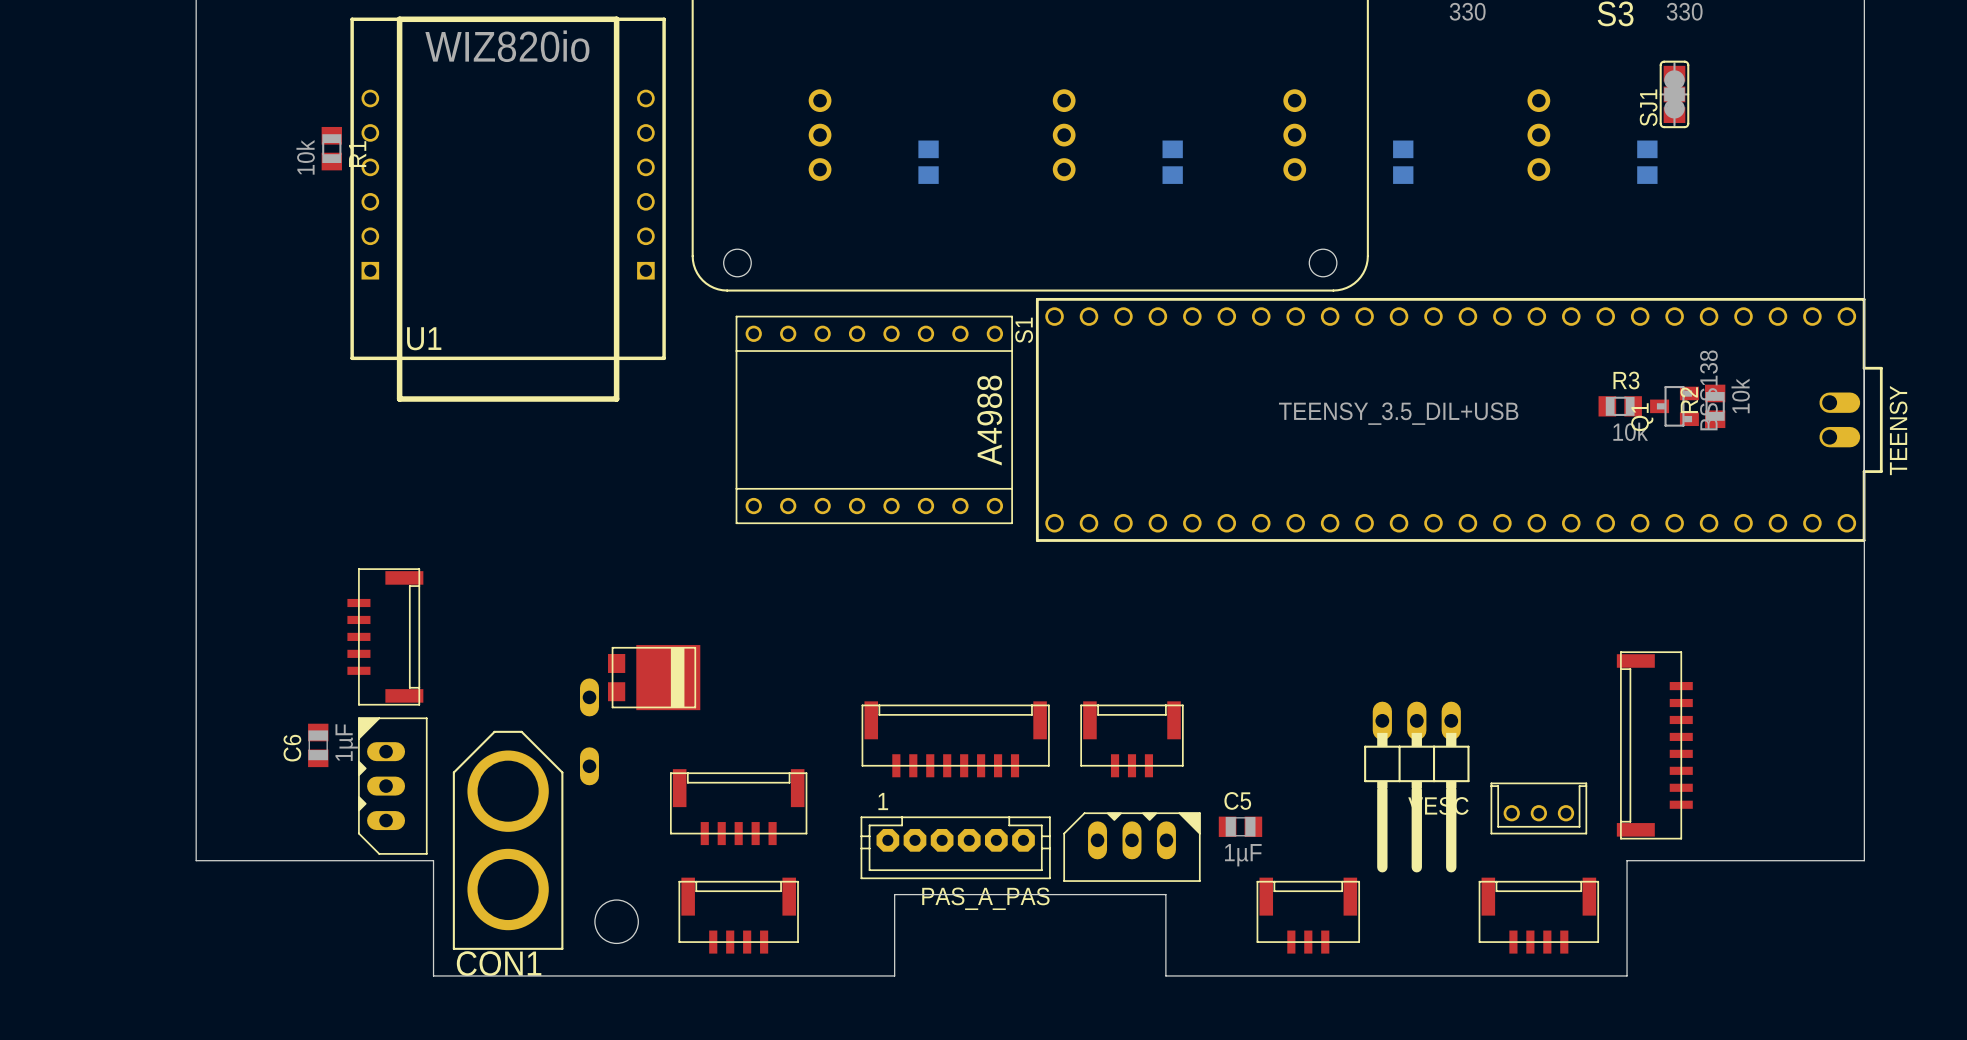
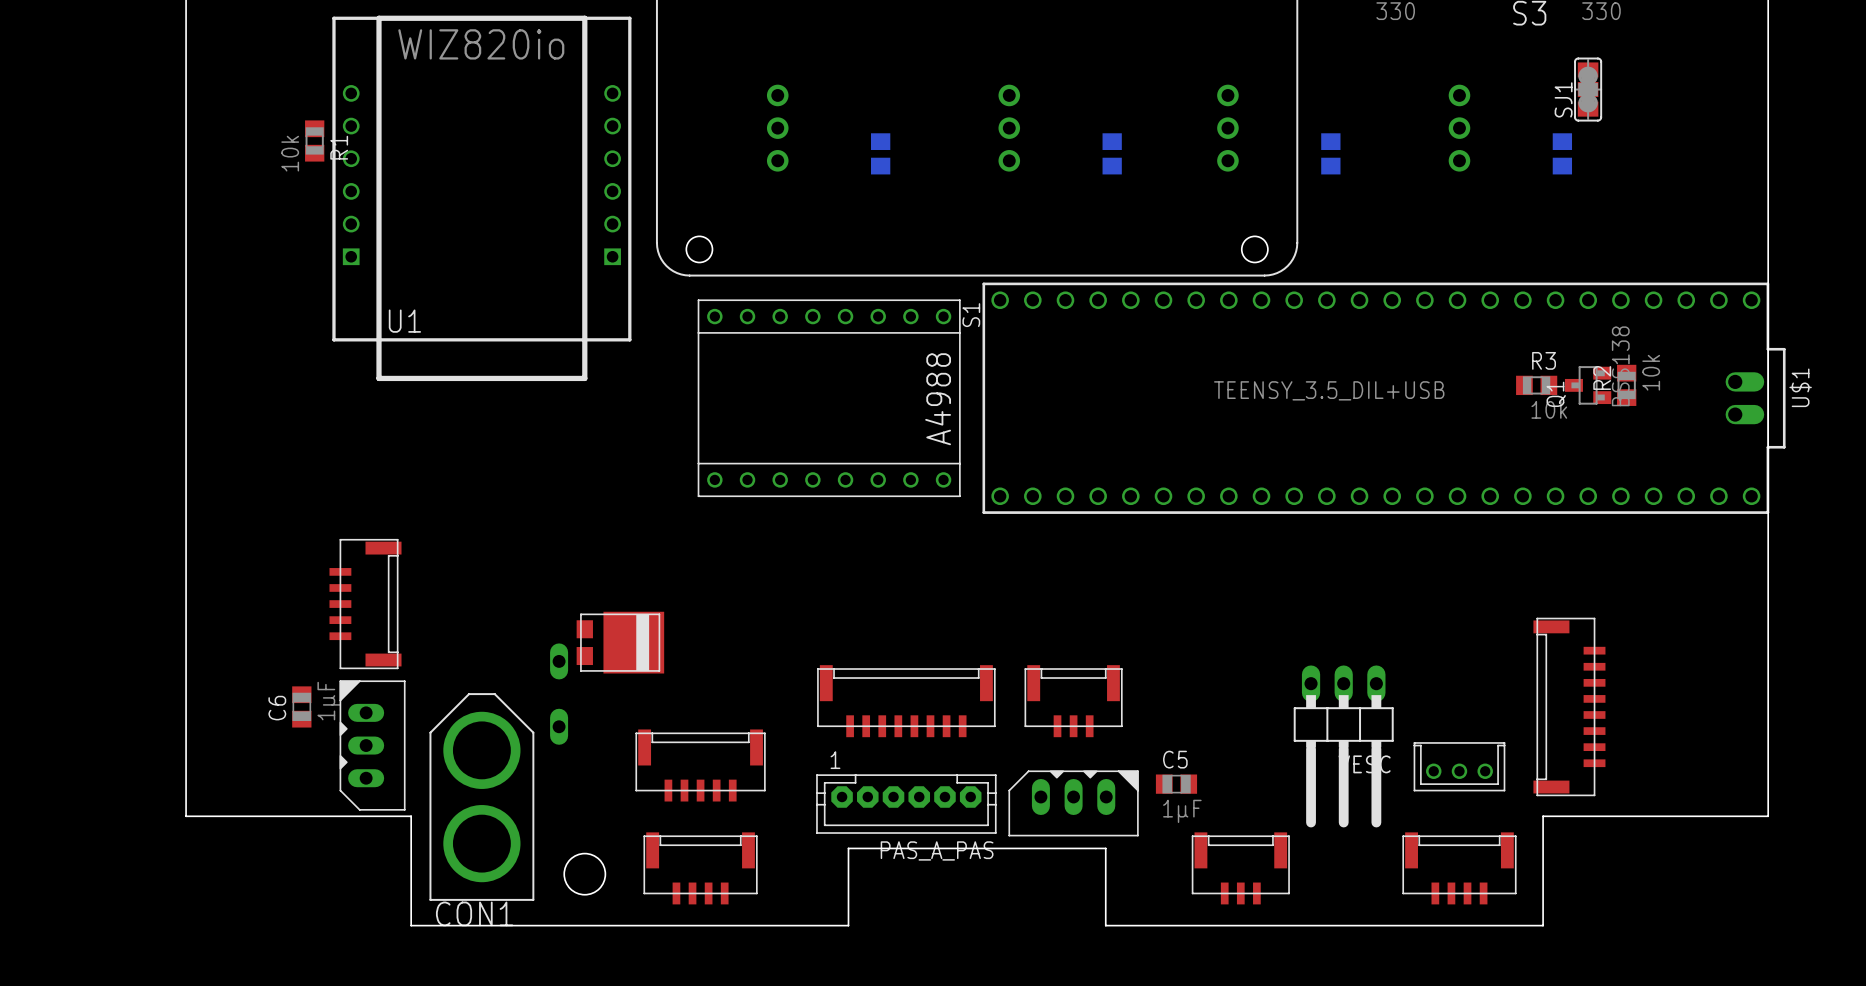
TEENSY name: TEENSY (1898, 430) -> U$1 (1800, 387)

